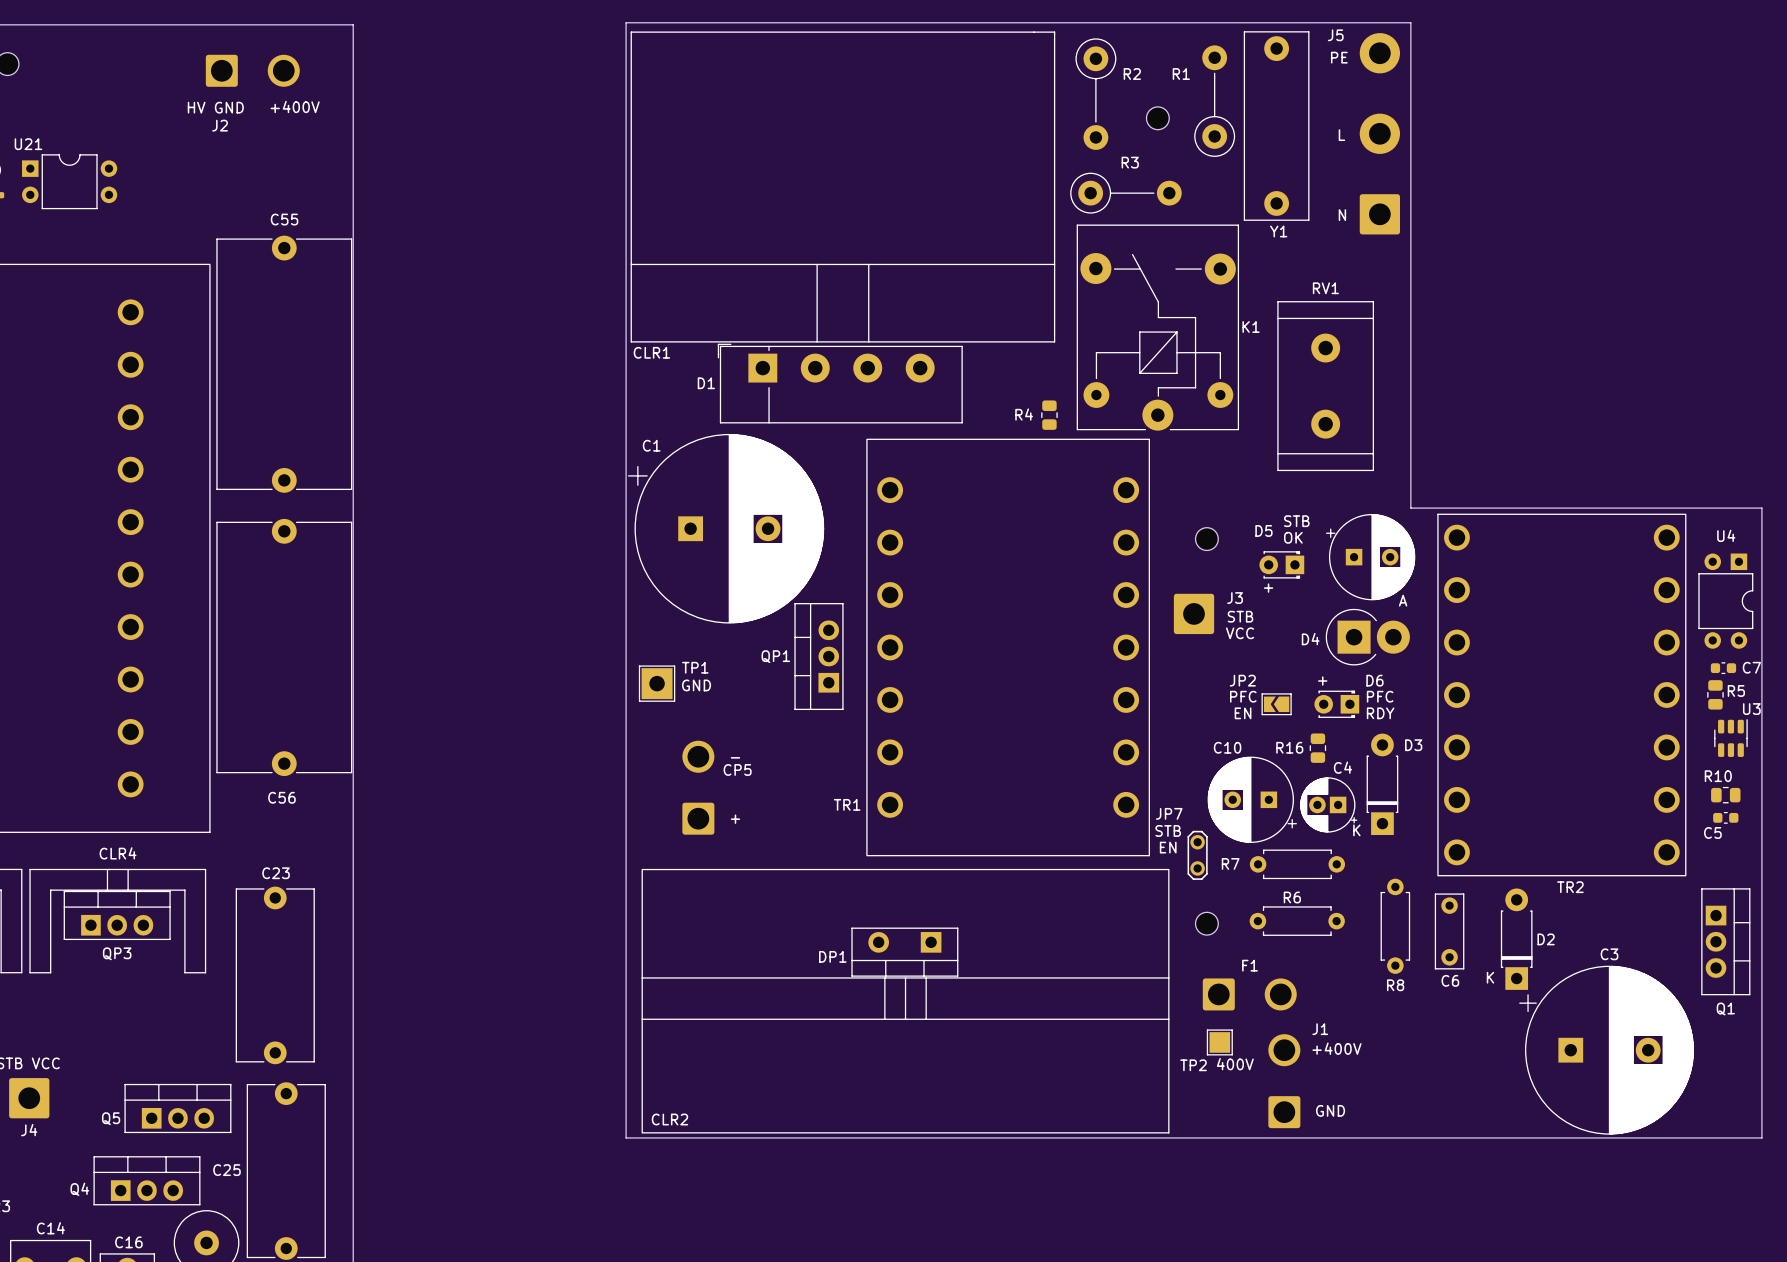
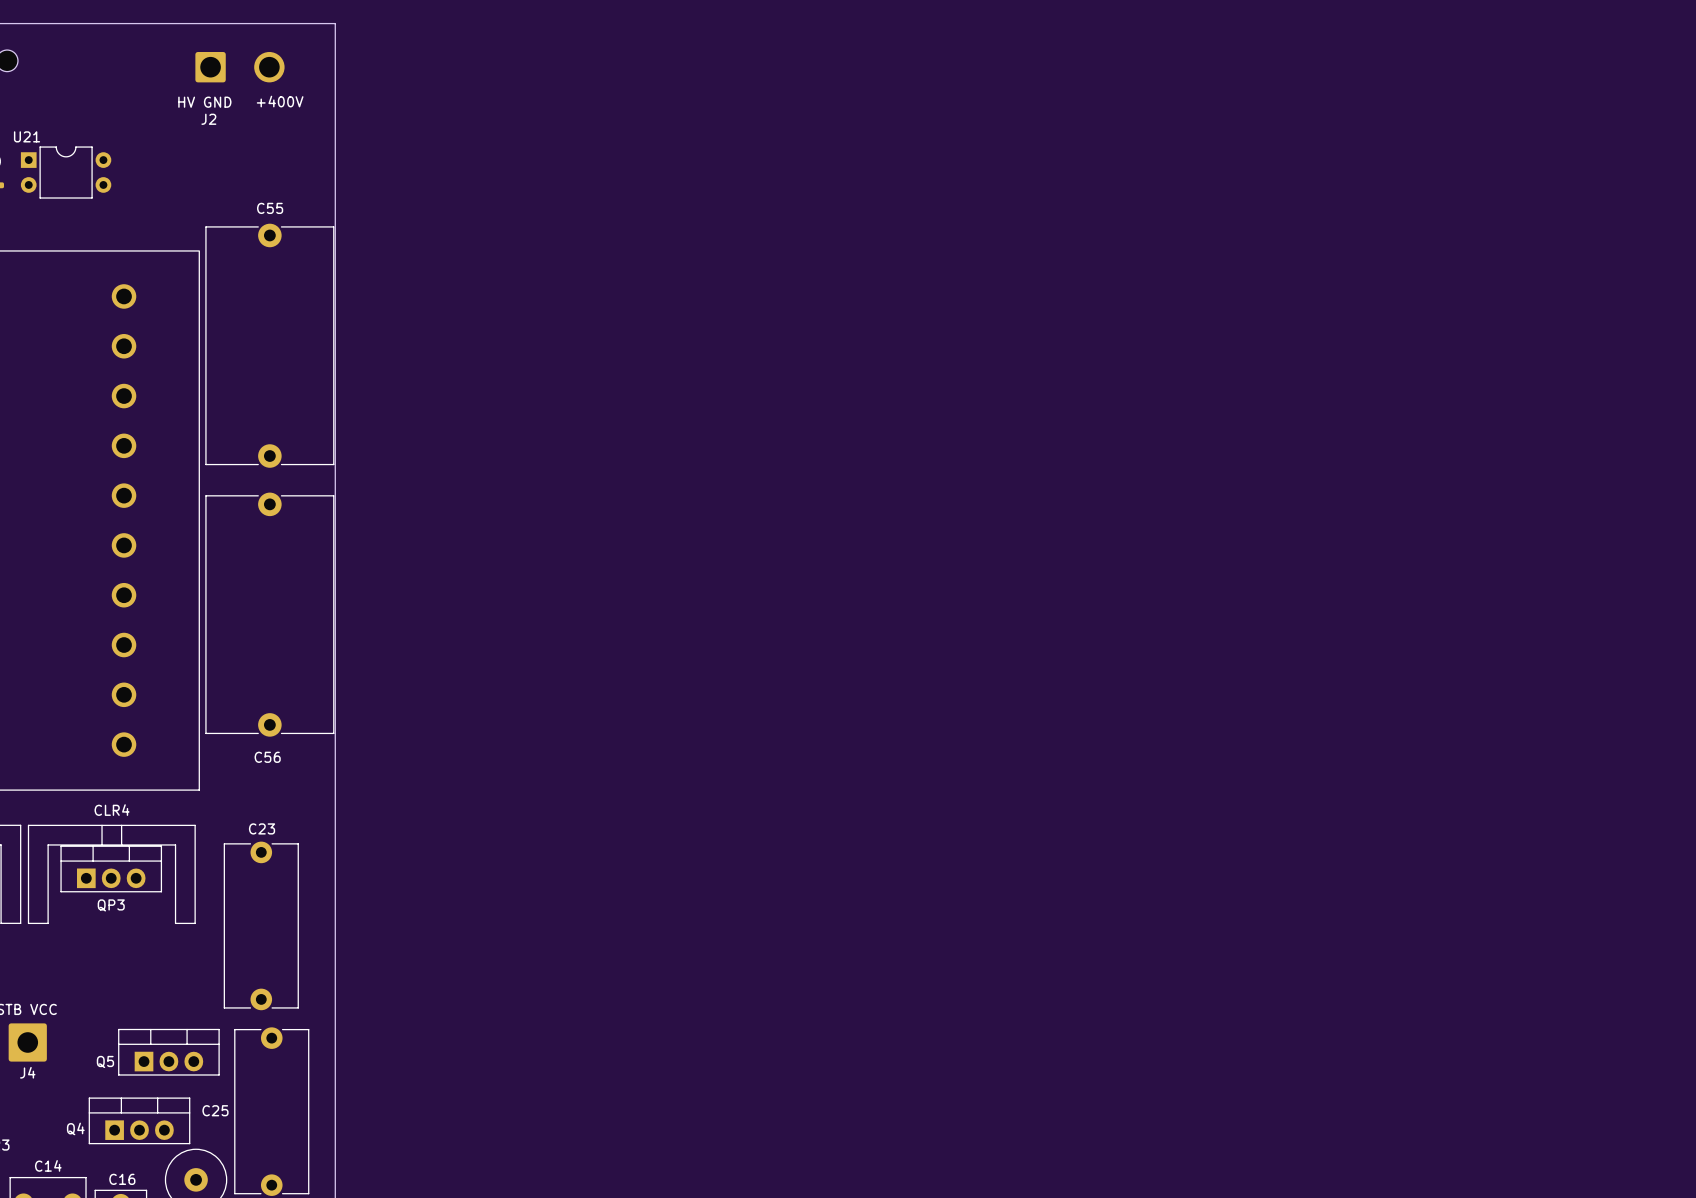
board edge: (626, 22) (1410, 22) (1410, 508) (1761, 508) (1761, 1137) (626, 1137) (626, 22) -> none
text: PE (1339, 57) -> none
R2: (1095, 94) -> none
R1: (1214, 101) -> none
part: (1157, 118) -> none
Y1: (1276, 126) -> none
J5: (1379, 133) -> none
text: L (1341, 135) -> none
CLR1: (842, 187) -> none
R3: (1125, 193) -> none
text: N (1342, 215) -> none
K1: (1157, 327) -> none
D1: (840, 383) -> none
RV1: (1325, 386) -> none
R4: (1049, 415) -> none
text: STB (1296, 521) -> none
C1: (726, 528) -> none
text: OK (1293, 537) -> none
part: (1206, 539) -> none
part: (1370, 557) -> none
D5: (1281, 564) -> none
text: + (1268, 588) -> none
U4: (1725, 601) -> none
J3: (1194, 613) -> none
text: STB (1240, 616) -> none
text: VCC (1239, 633) -> none
D4: (1367, 637) -> none
TR1: (1008, 647) -> none
QP1: (818, 656) -> none
C7: (1723, 668) -> none
text: + (1322, 681) -> none
TP1: (657, 683) -> none
text: GND (696, 685) -> none
TR2: (1561, 694) -> none
R5: (1715, 694) -> none
text: PFC (1243, 696) -> none
text: PFC (1380, 696) -> none
JP2: (1276, 704) -> none
D6: (1336, 704) -> none
text: EN (1243, 713) -> none
text: RDY (1380, 713) -> none
U3: (1730, 738) -> none
R16: (1317, 748) -> none
text: - (735, 757) -> none
D3: (1382, 784) -> none
CP5: (698, 787) -> none
R10: (1725, 795) -> none
C10: (1252, 799) -> none
C4: (1328, 804) -> none
C5: (1725, 817) -> none
text: + (735, 819) -> none
text: STB (1168, 830) -> none
text: EN (1168, 847) -> none
JP7: (1197, 855) -> none
R7: (1297, 864) -> none
R6: (1297, 921) -> none
part: (1206, 923) -> none
R8: (1395, 926) -> none
C6: (1449, 931) -> none
D2: (1516, 939) -> none
Q1: (1725, 941) -> none
DP1: (904, 952) -> none
F1: (1249, 994) -> none
CLR2: (905, 1001) -> none
TP2: (1219, 1042) -> none
text: +400V (1336, 1048) -> none
C3: (1606, 1050) -> none
text: 400V (1235, 1064) -> none
J1: (1284, 1081) -> none
text: GND (1330, 1110) -> none

